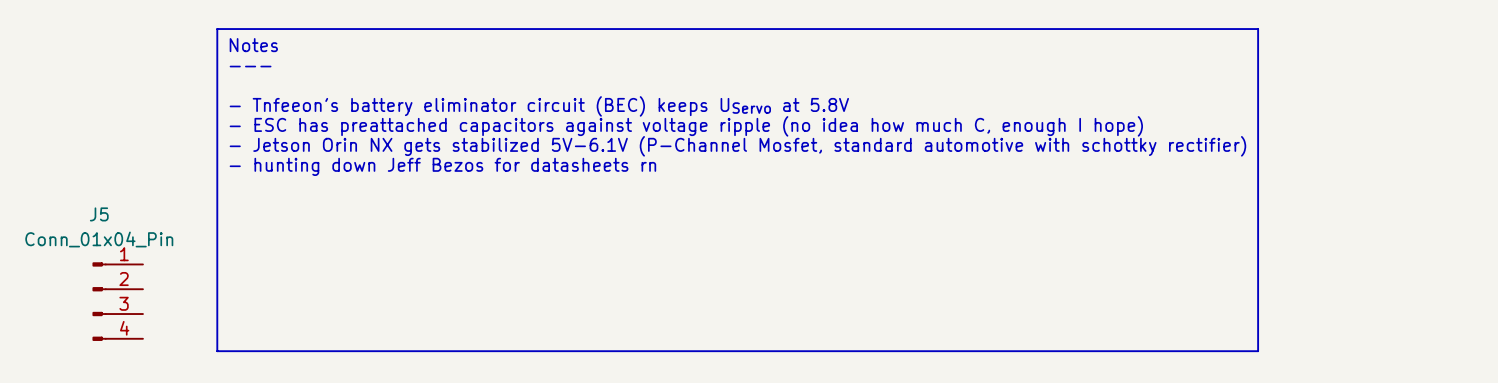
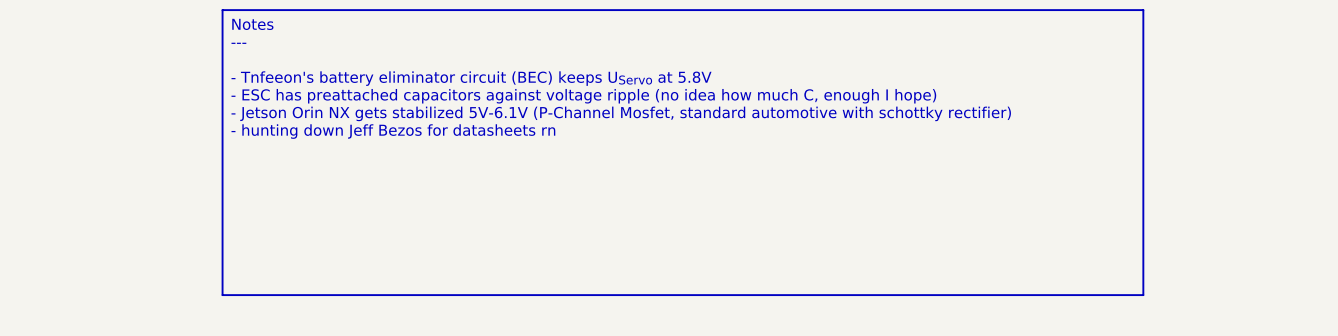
J5: Conn_01x04_Pin (117, 301) -> none

